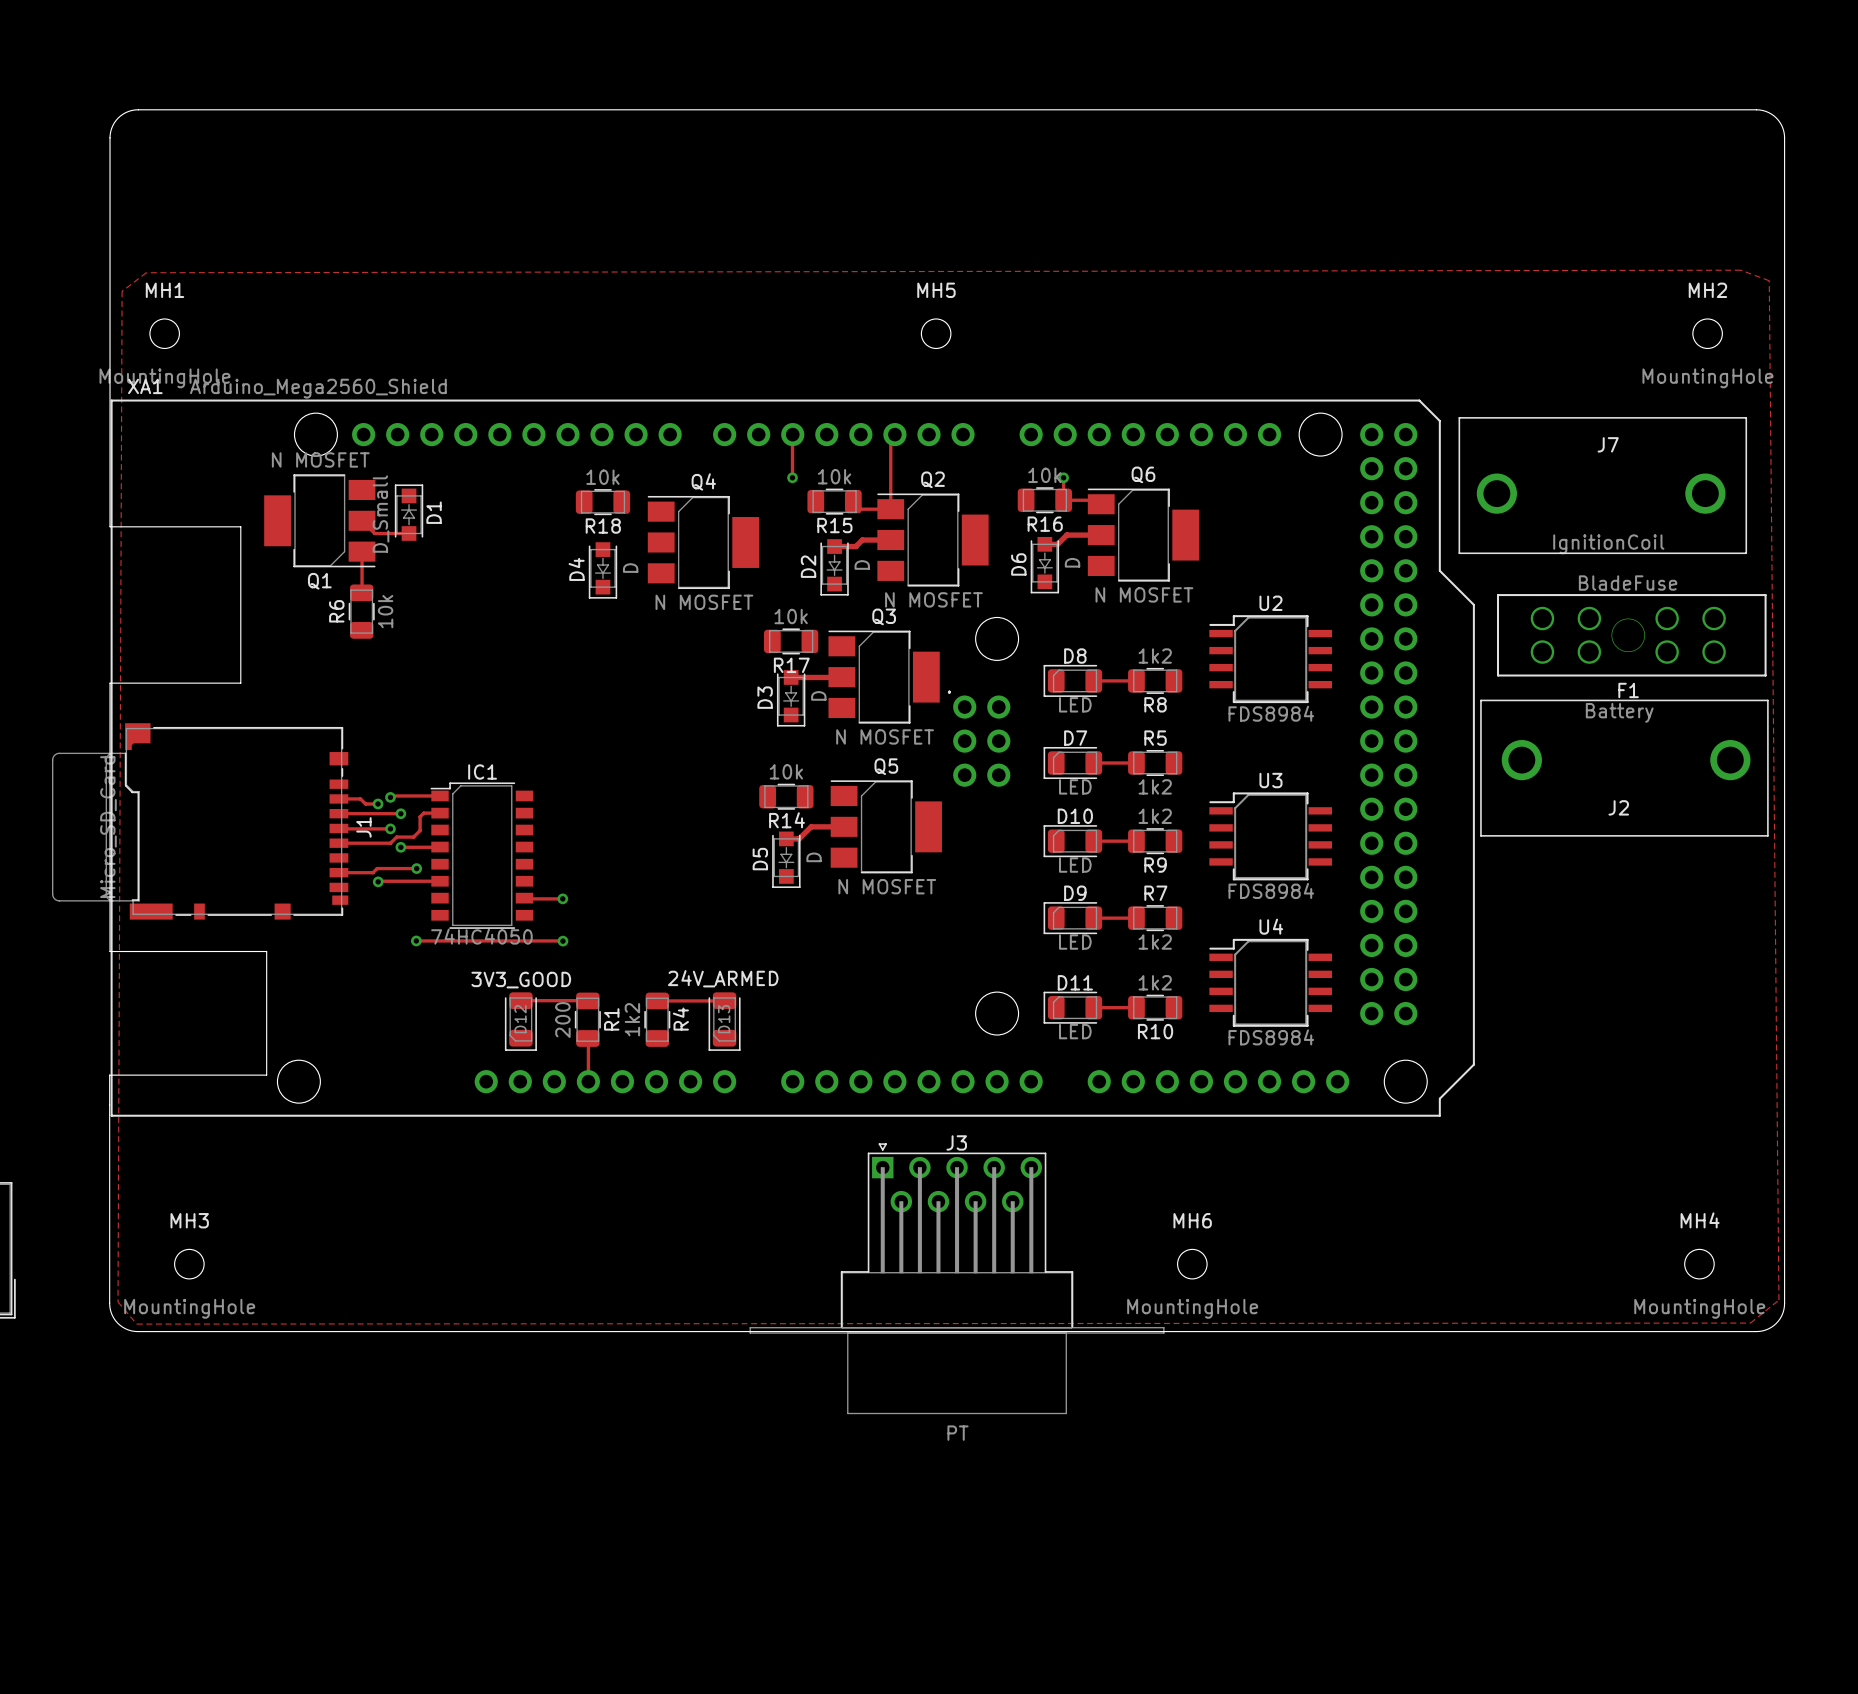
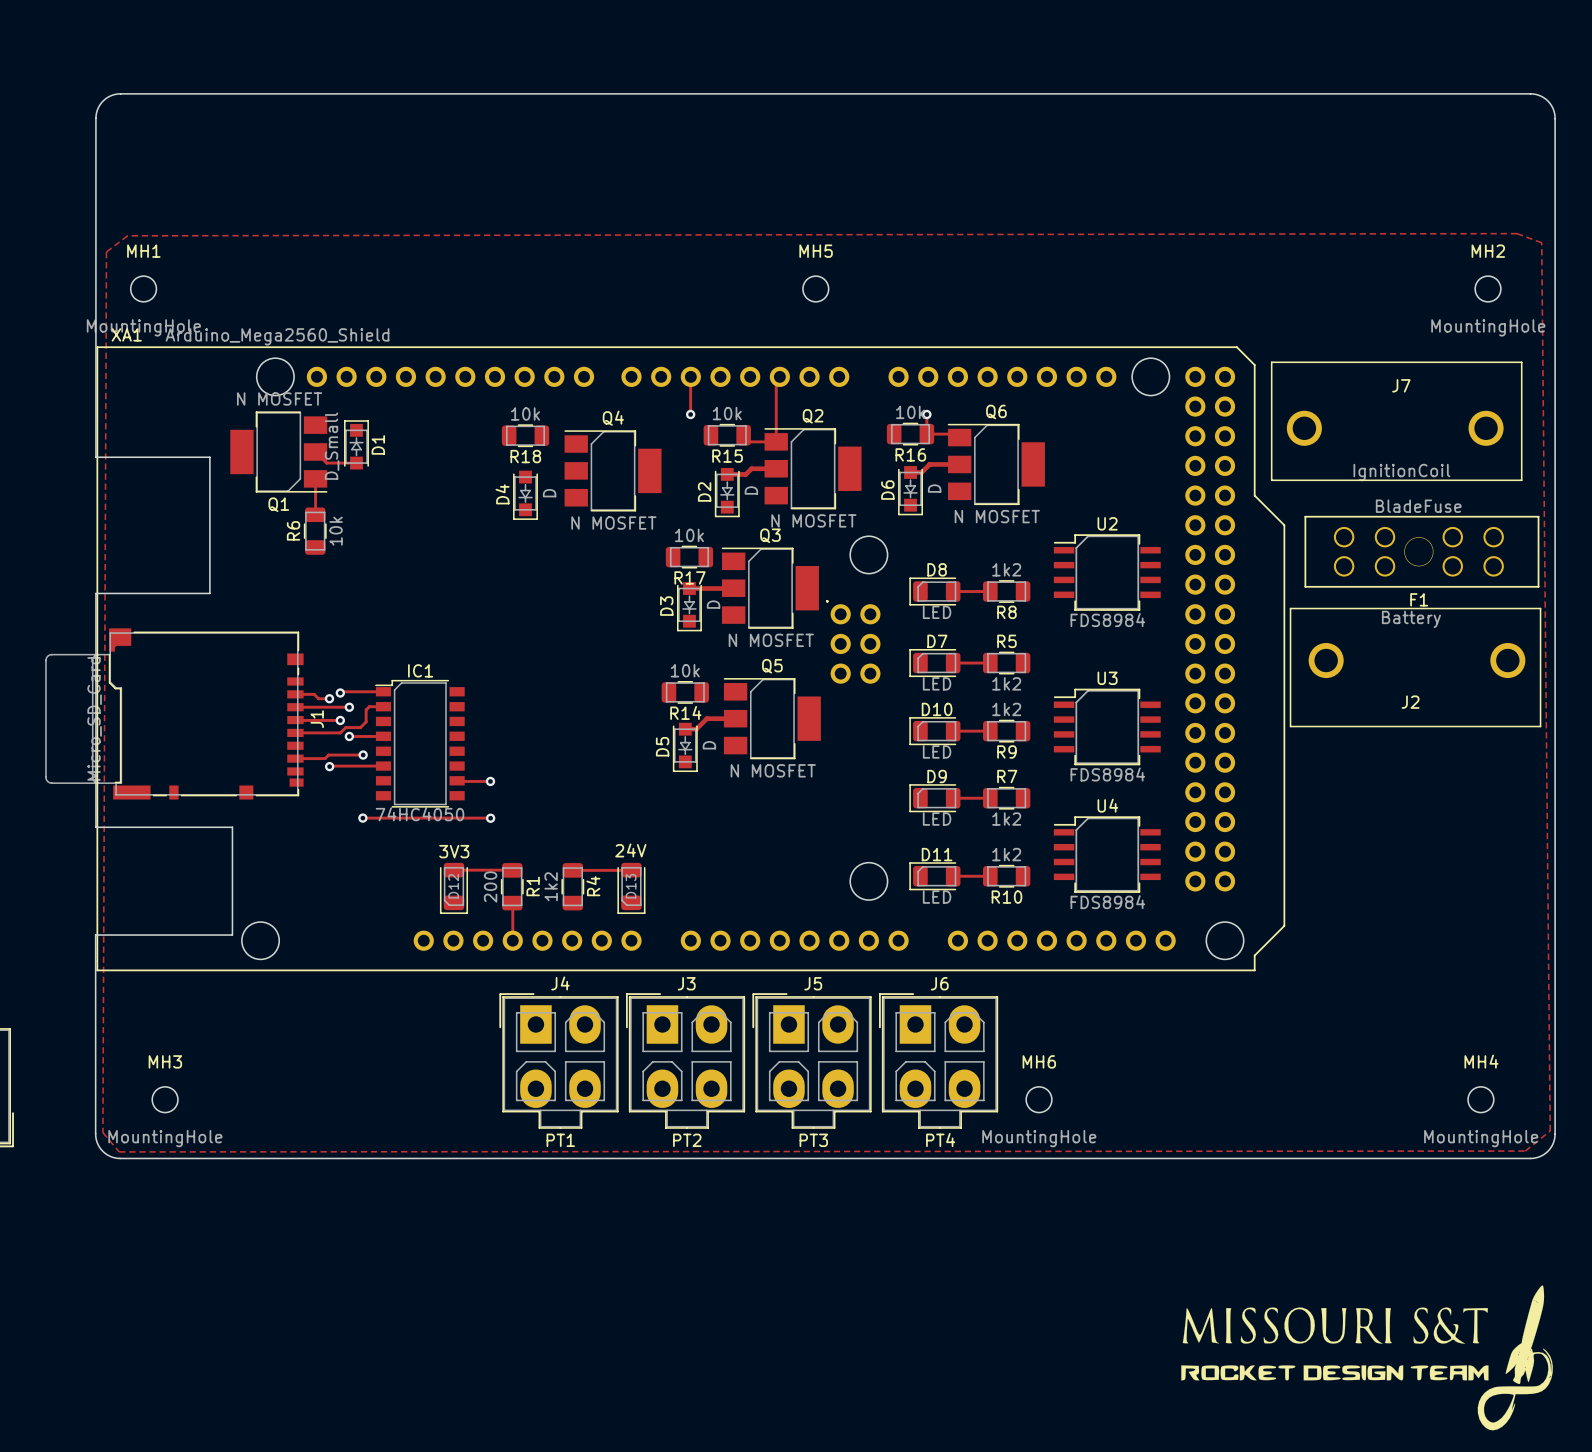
D13 value: 24V_ARMED (723, 978) -> 24V (630, 850)
D12 value: 3V3_GOOD (521, 980) -> 3V3 (454, 851)
J3 name position: J3 (956, 1142) -> J3 (686, 983)
J3 footprint: [749, 1143, 1165, 1415] -> [626, 993, 746, 1129]
J4: none -> PT1 (559, 1061)
J5: none -> PT3 (812, 1061)
J6: none -> PT4 (938, 1061)
J3 value: PT (958, 1433) -> PT2 (687, 1140)
drawing: none -> [1181, 1285, 1553, 1431]

